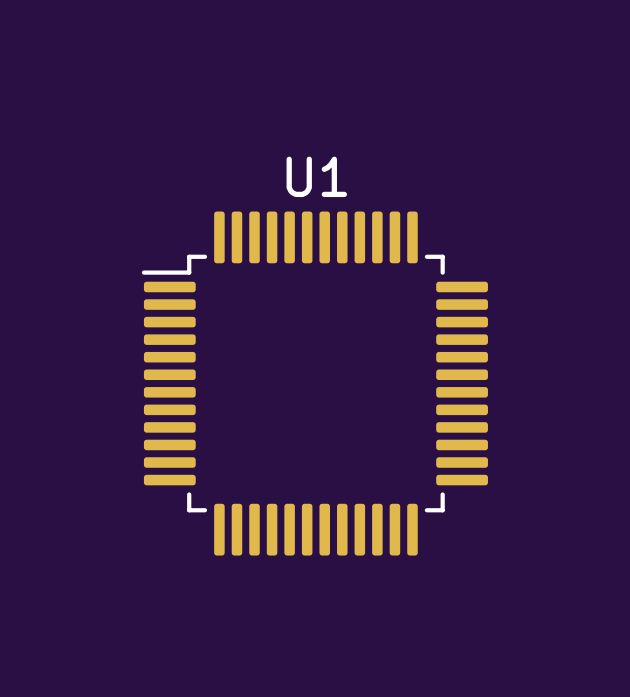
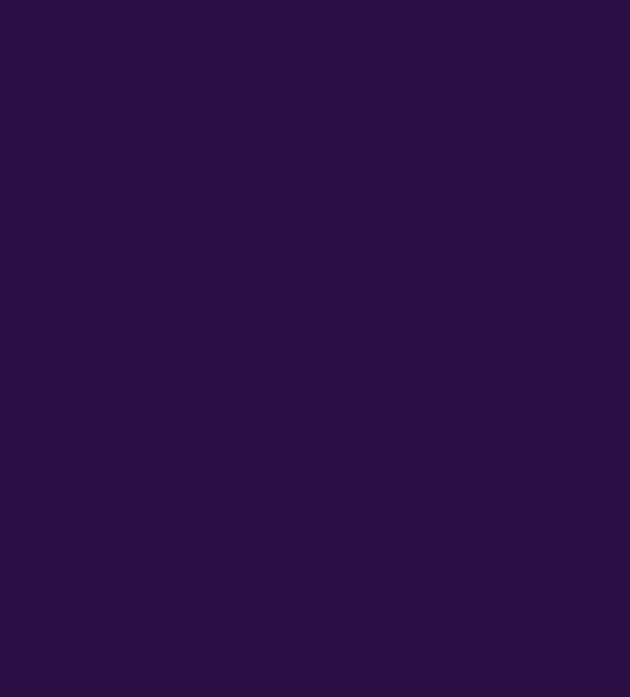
U1: (314, 383) -> none

